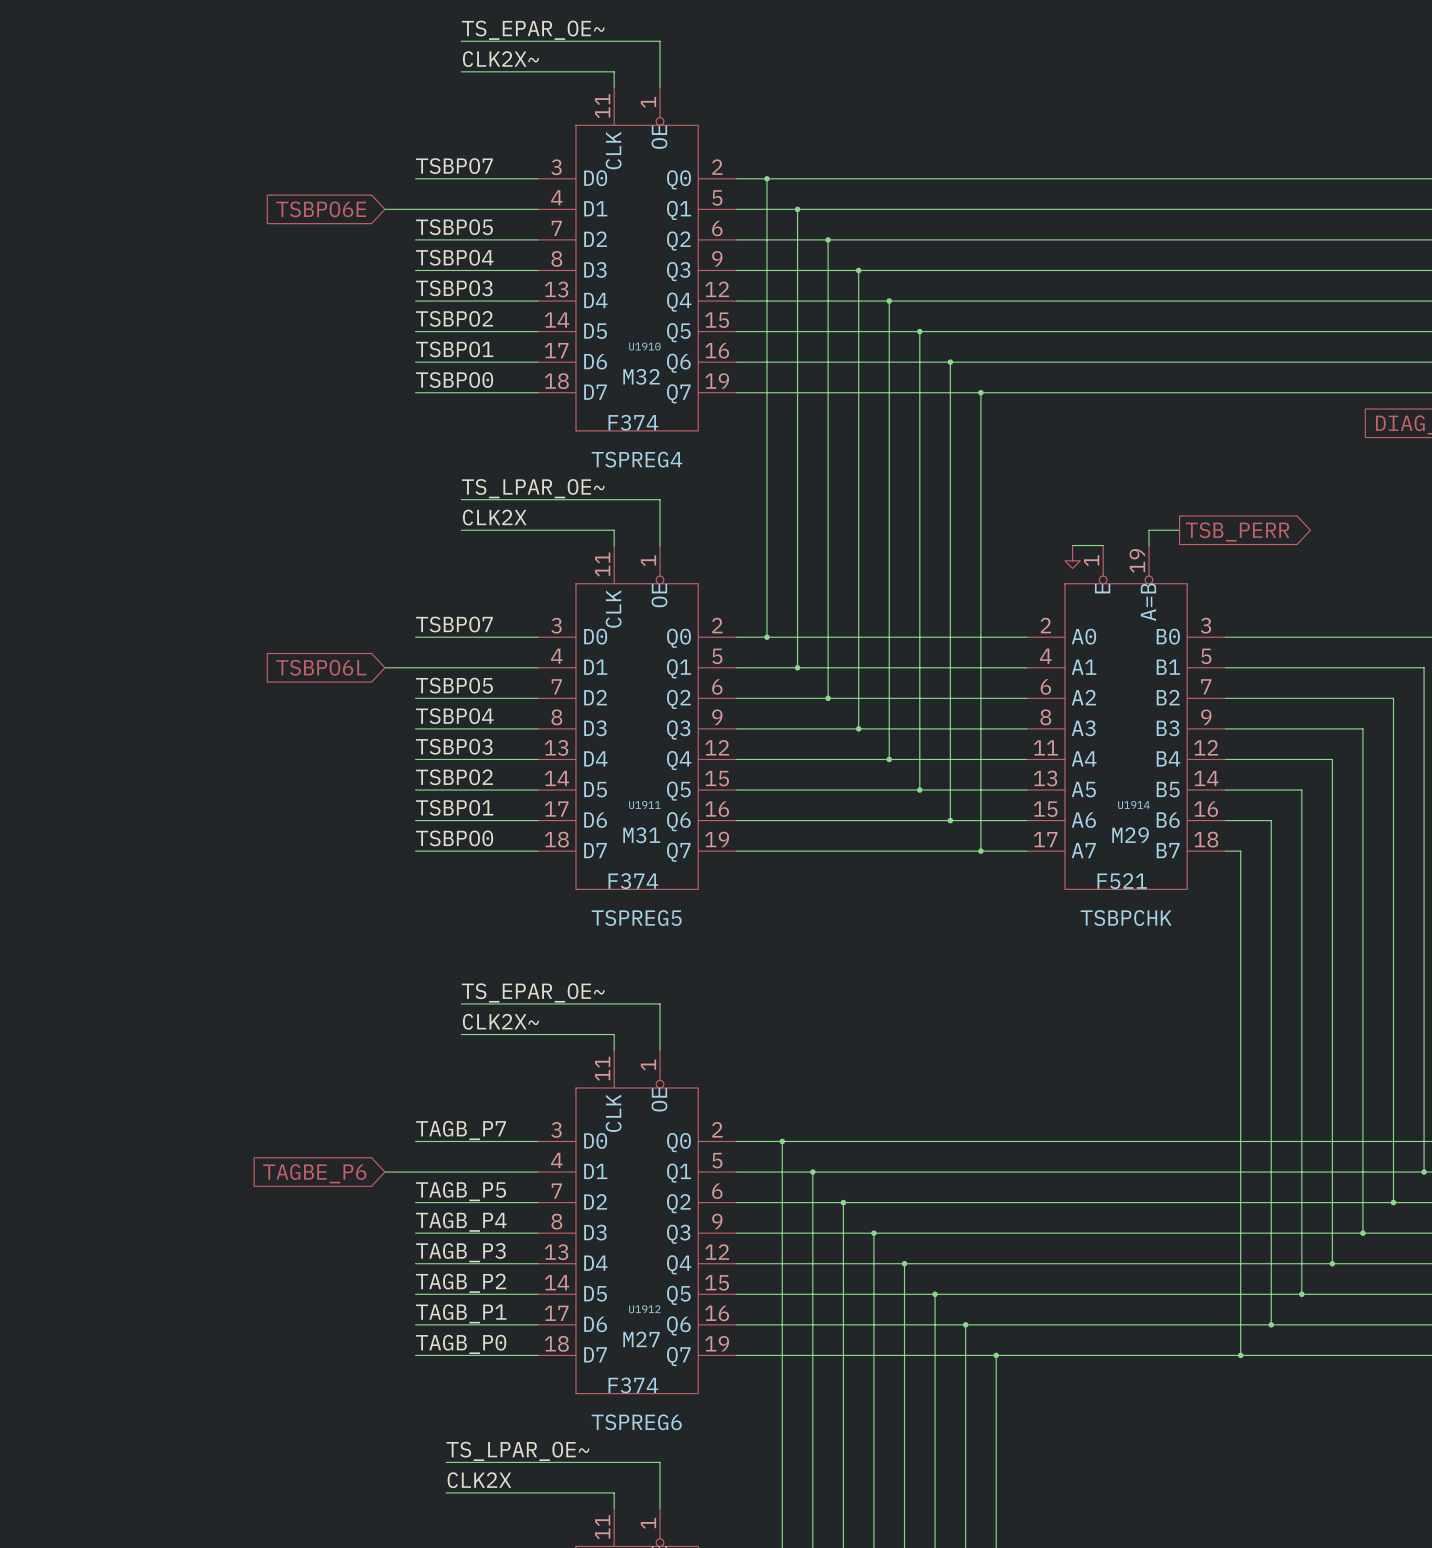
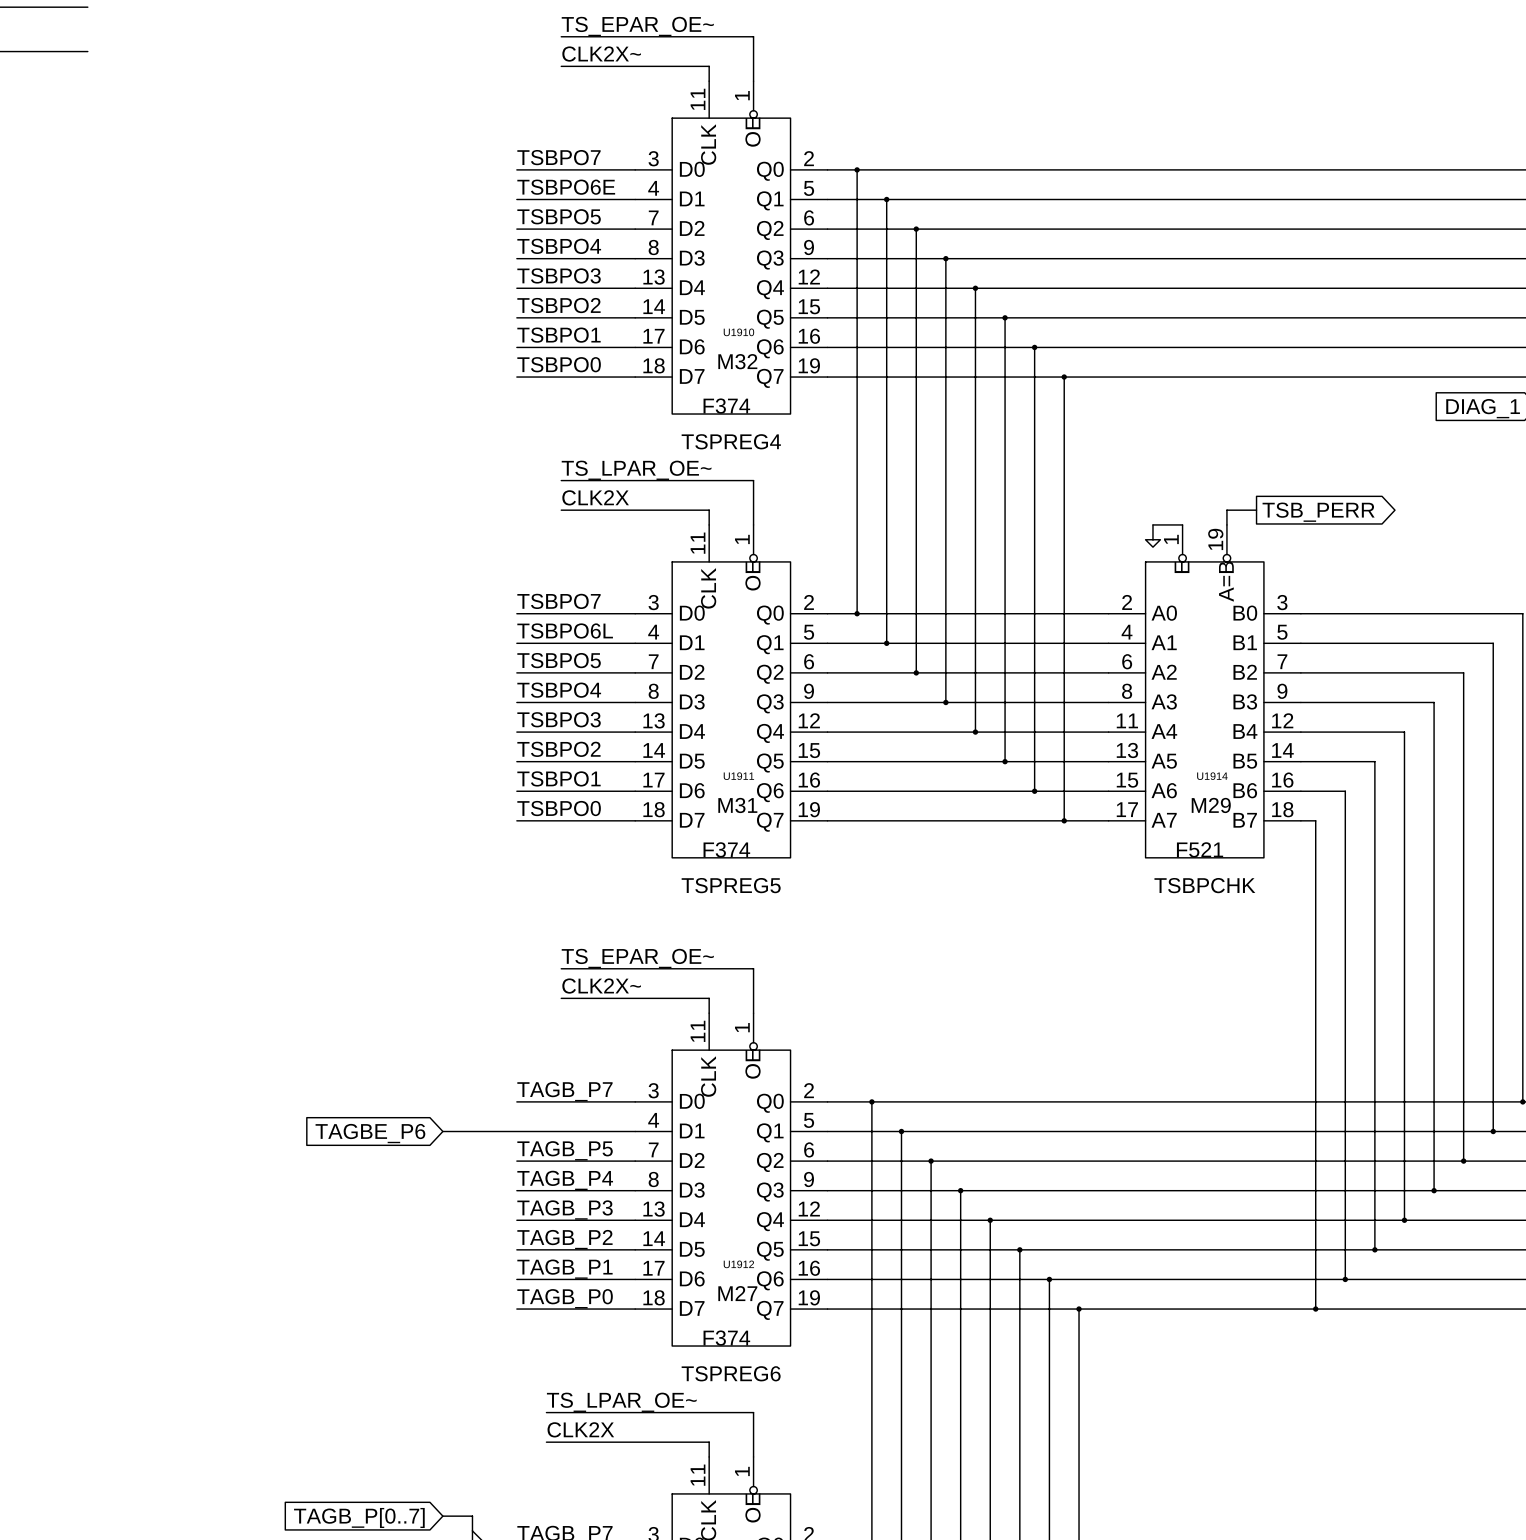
label: none -> TSBPO6E (566, 187)
global label: TSBPO6E (321, 209) -> none
wire: (384, 209) (415, 209) -> none
label: none -> TSBPO6L (565, 630)
global label: TSBPO6L (321, 667) -> none
wire: (384, 667) (415, 667) -> none
wire: none -> (442, 1131) (487, 1131)
global label position: TAGBE_P6 (314, 1173) -> TAGBE_P6 (370, 1133)

